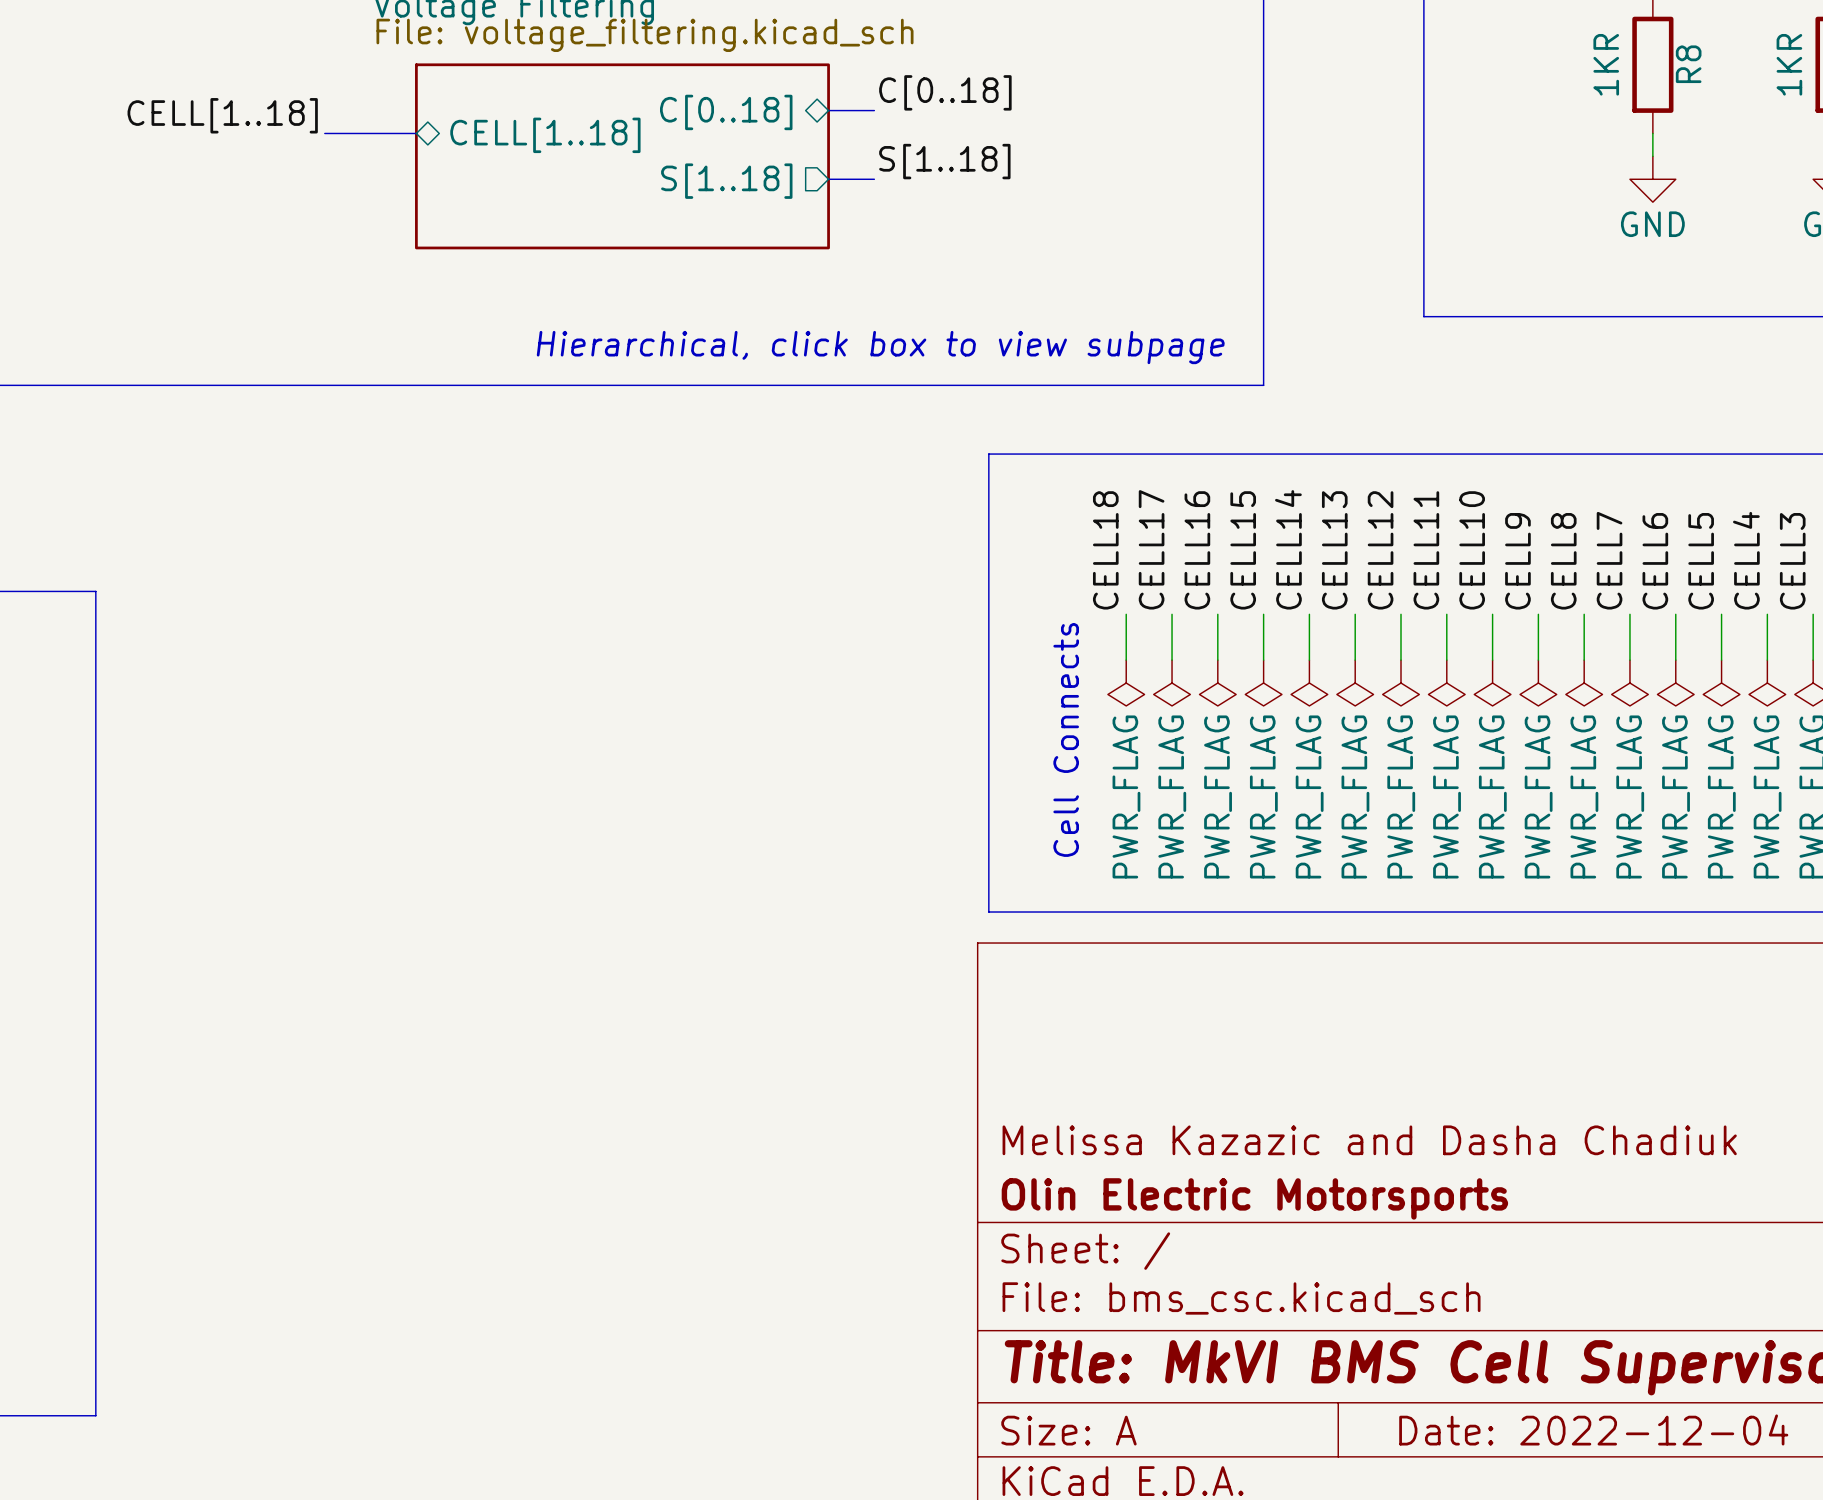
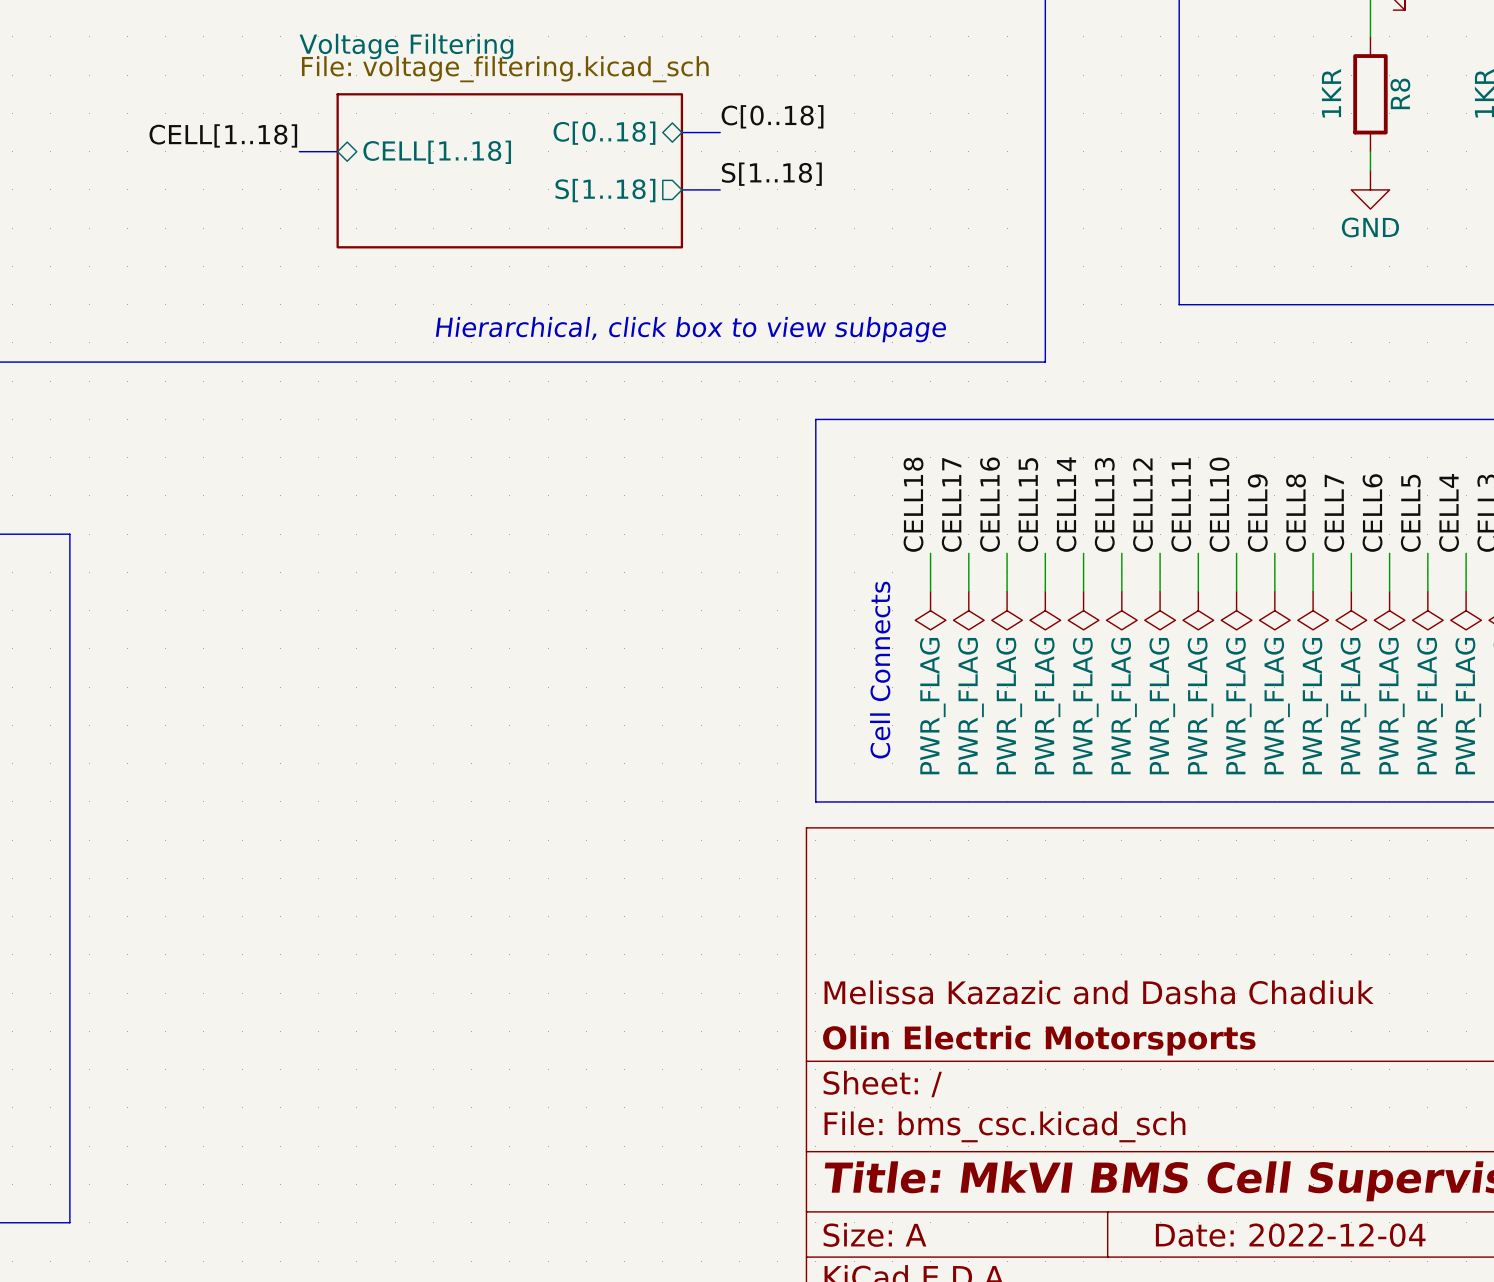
label position: CELL[1..18] (222, 115) -> CELL[1..18] (223, 135)
bus: (324, 133) (370, 133) -> none

